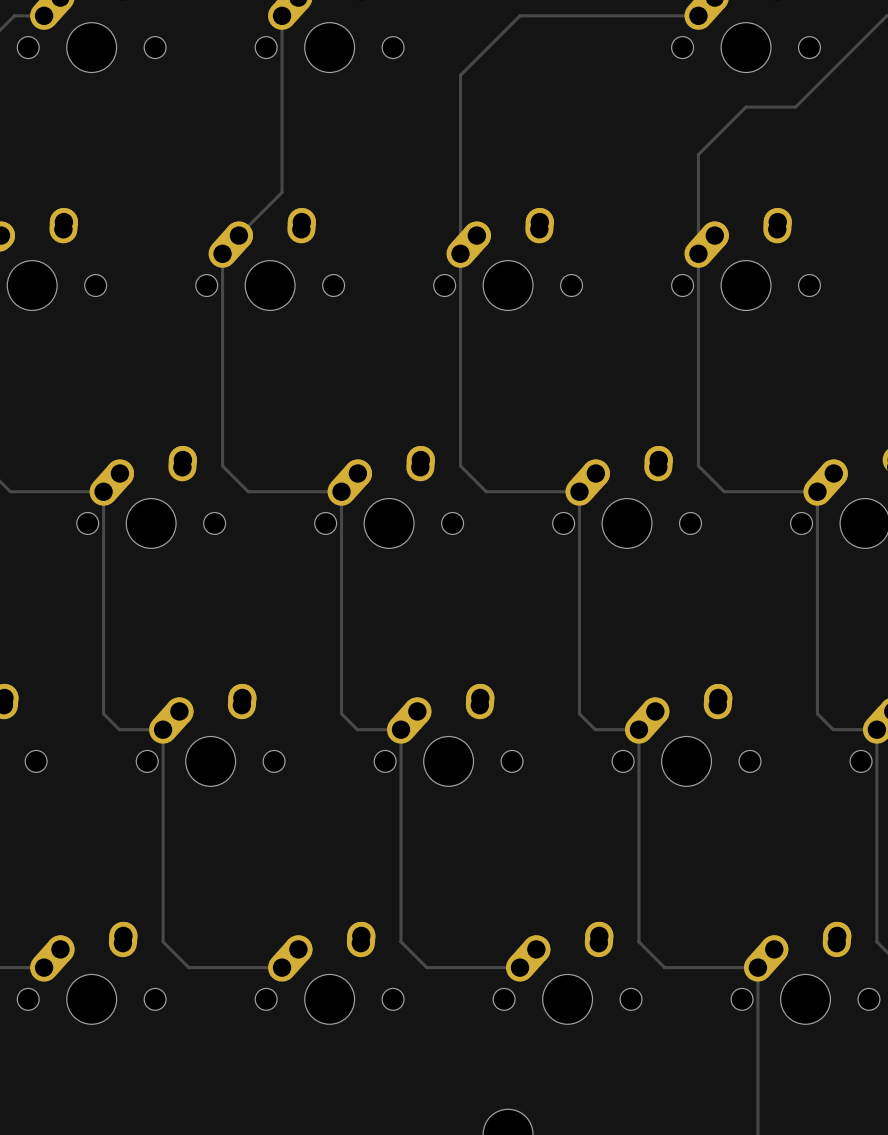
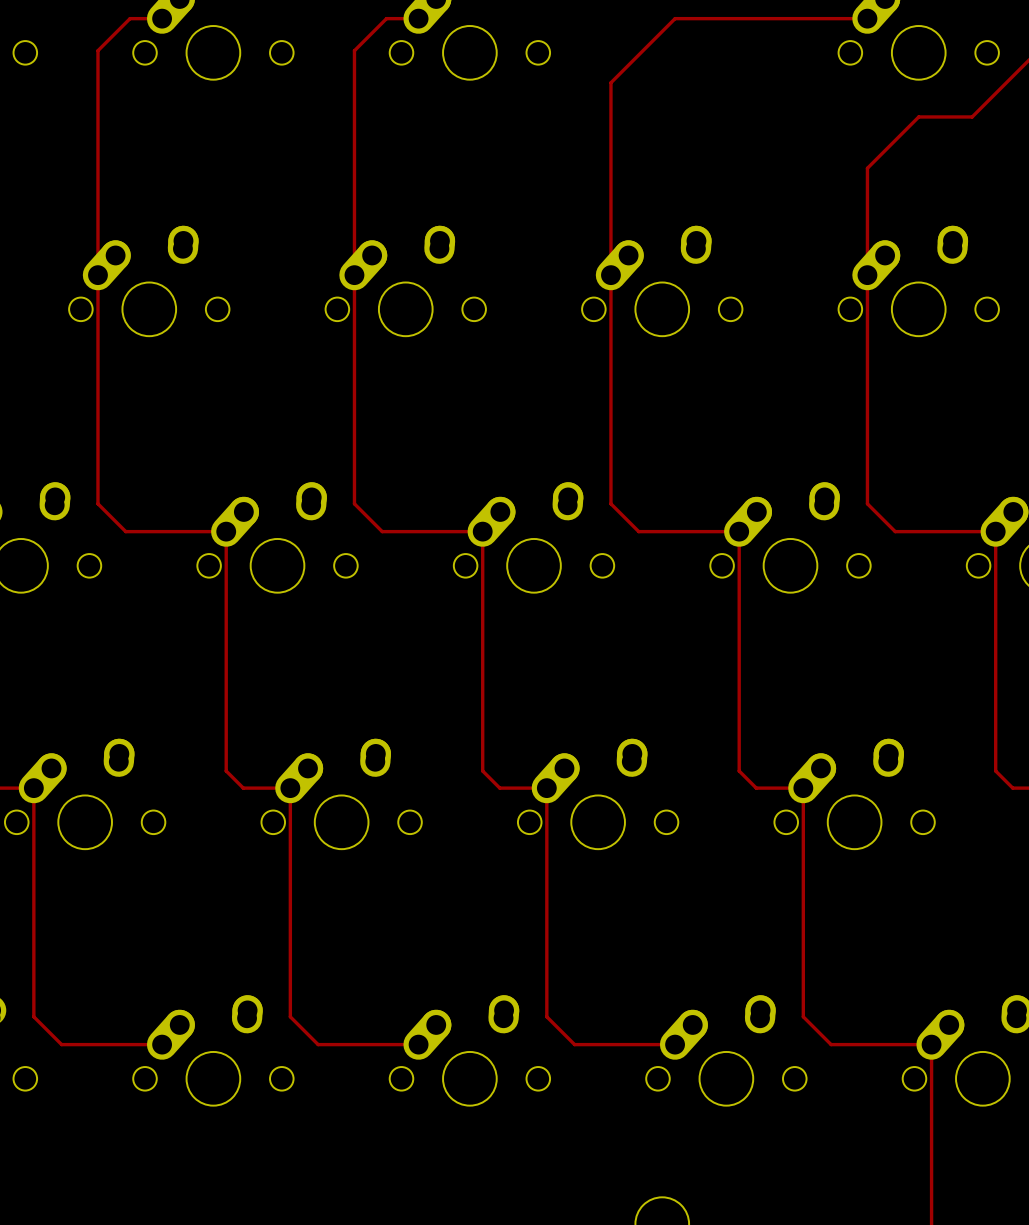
track: (282, 15) (282, 192) (222, 251) -> (418, 18) (386, 18) (354, 50) (354, 273)

